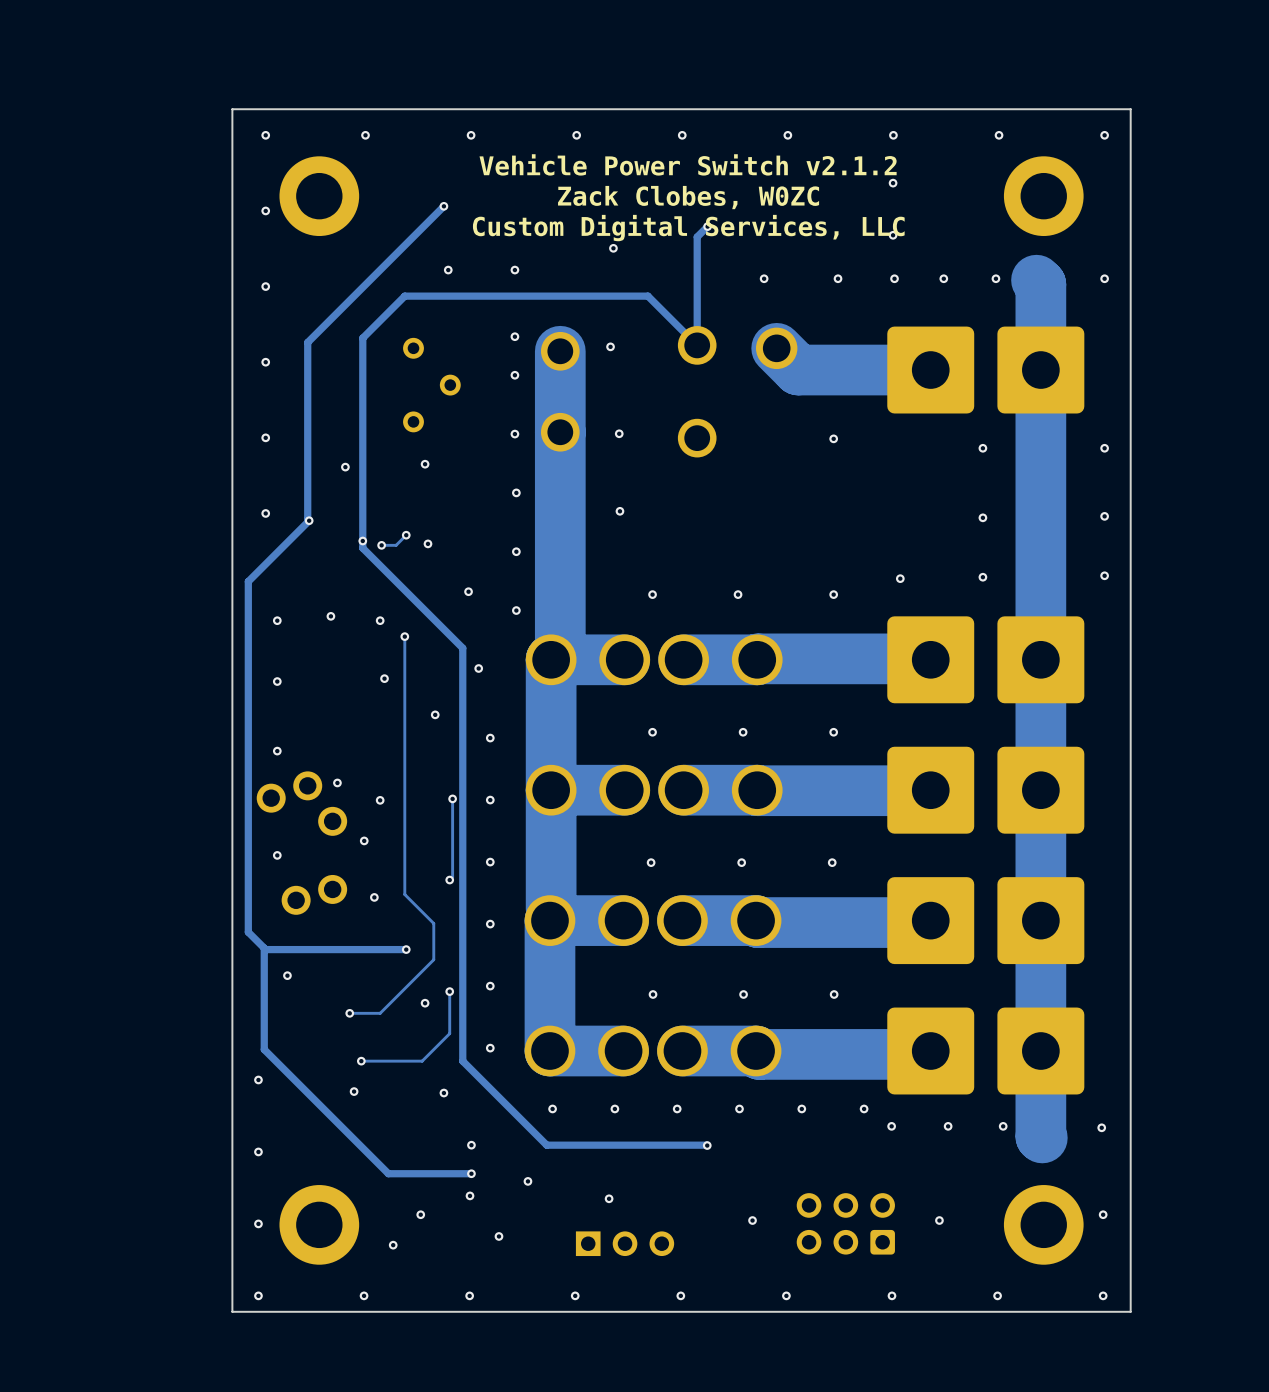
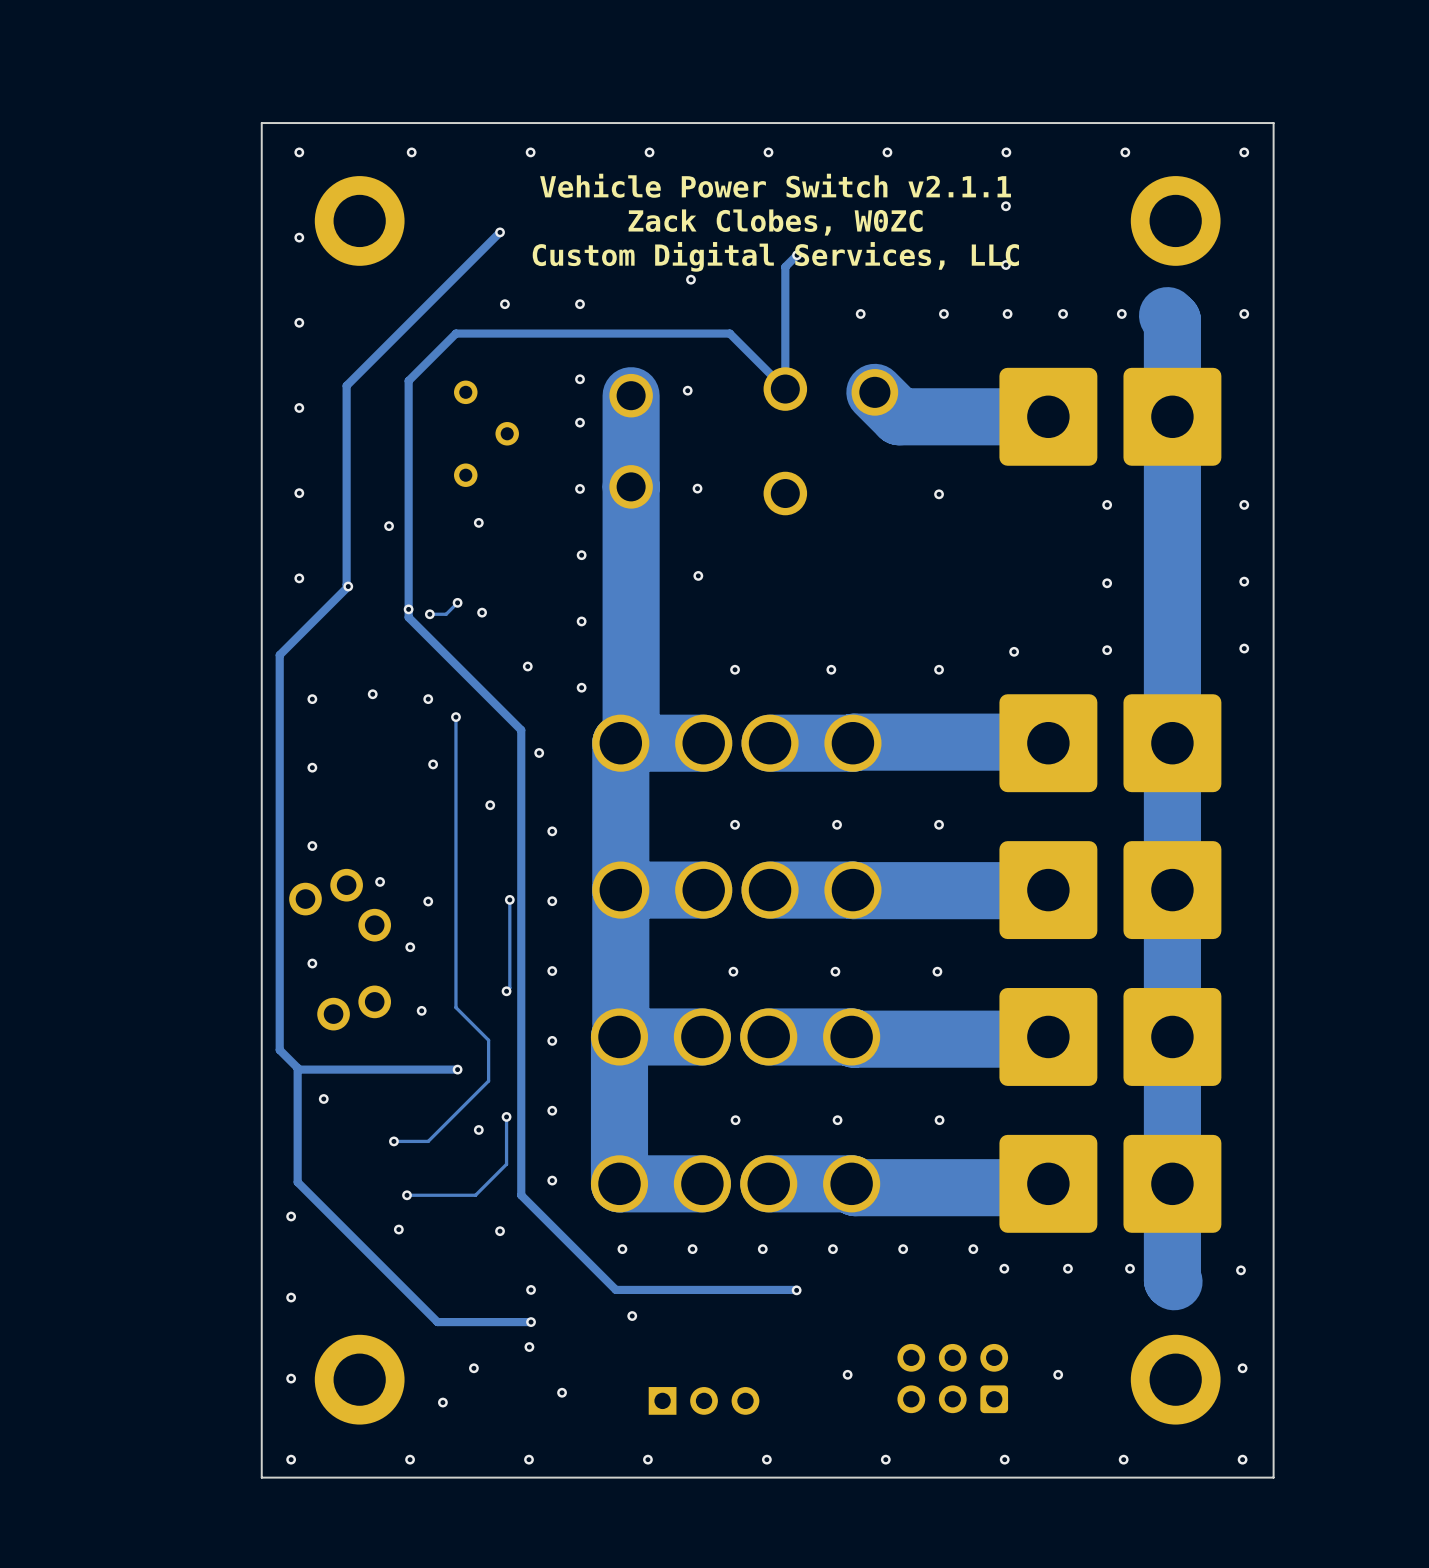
text: Vehicle Power Switch v2.1.2 (688, 164) -> Vehicle Power Switch v2.1.1 (775, 185)
via: none -> (632, 1316)
via: (527, 1181) -> none
via: (609, 1198) -> none

